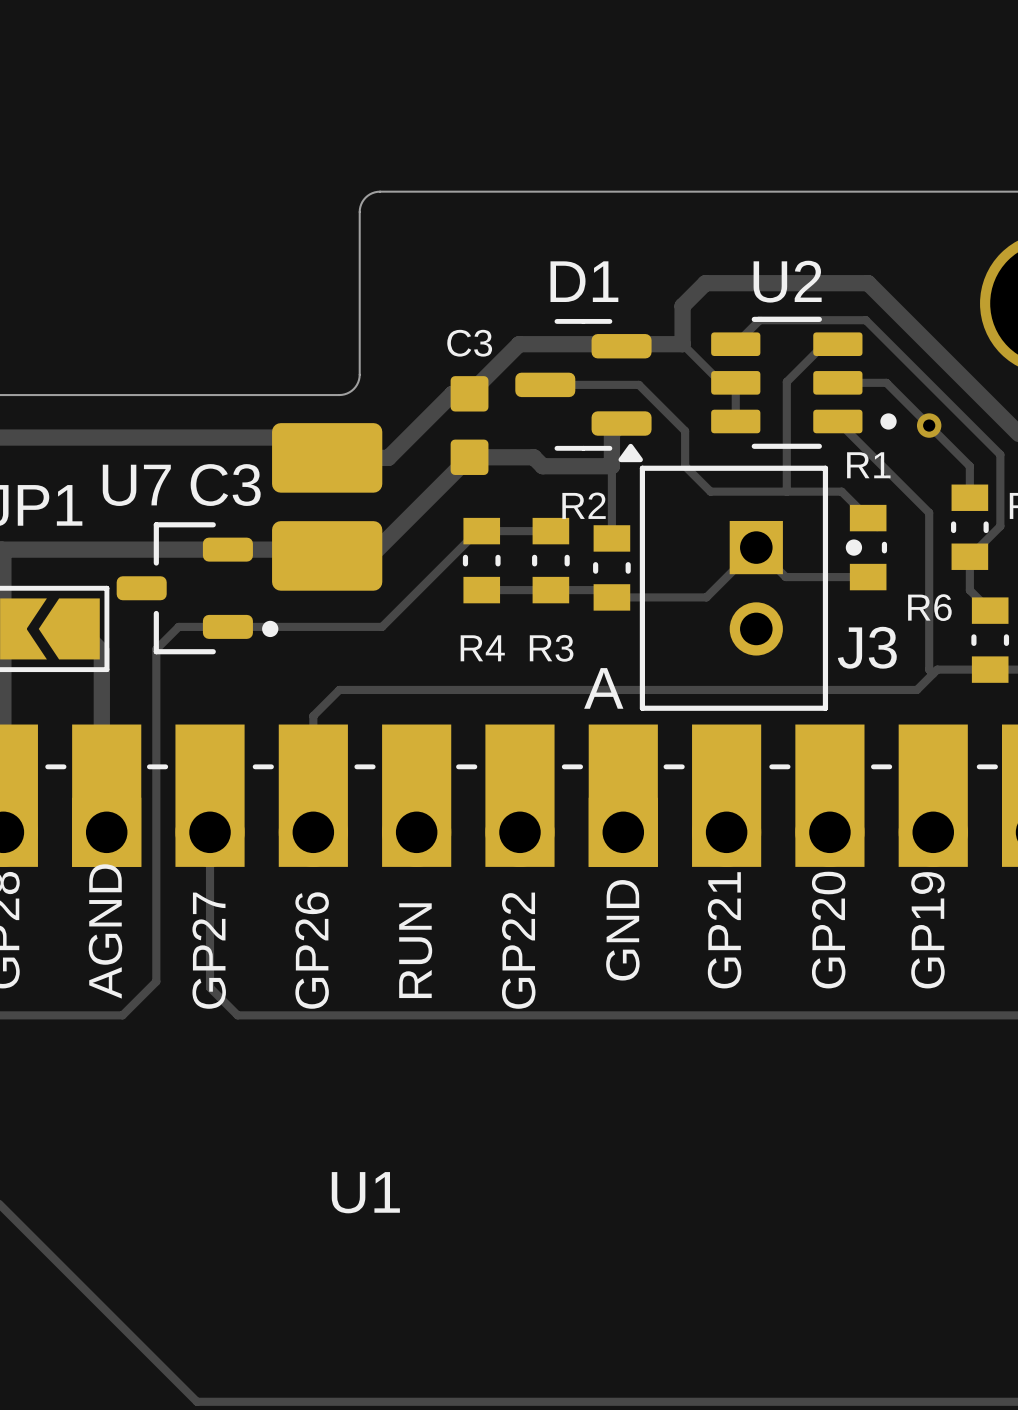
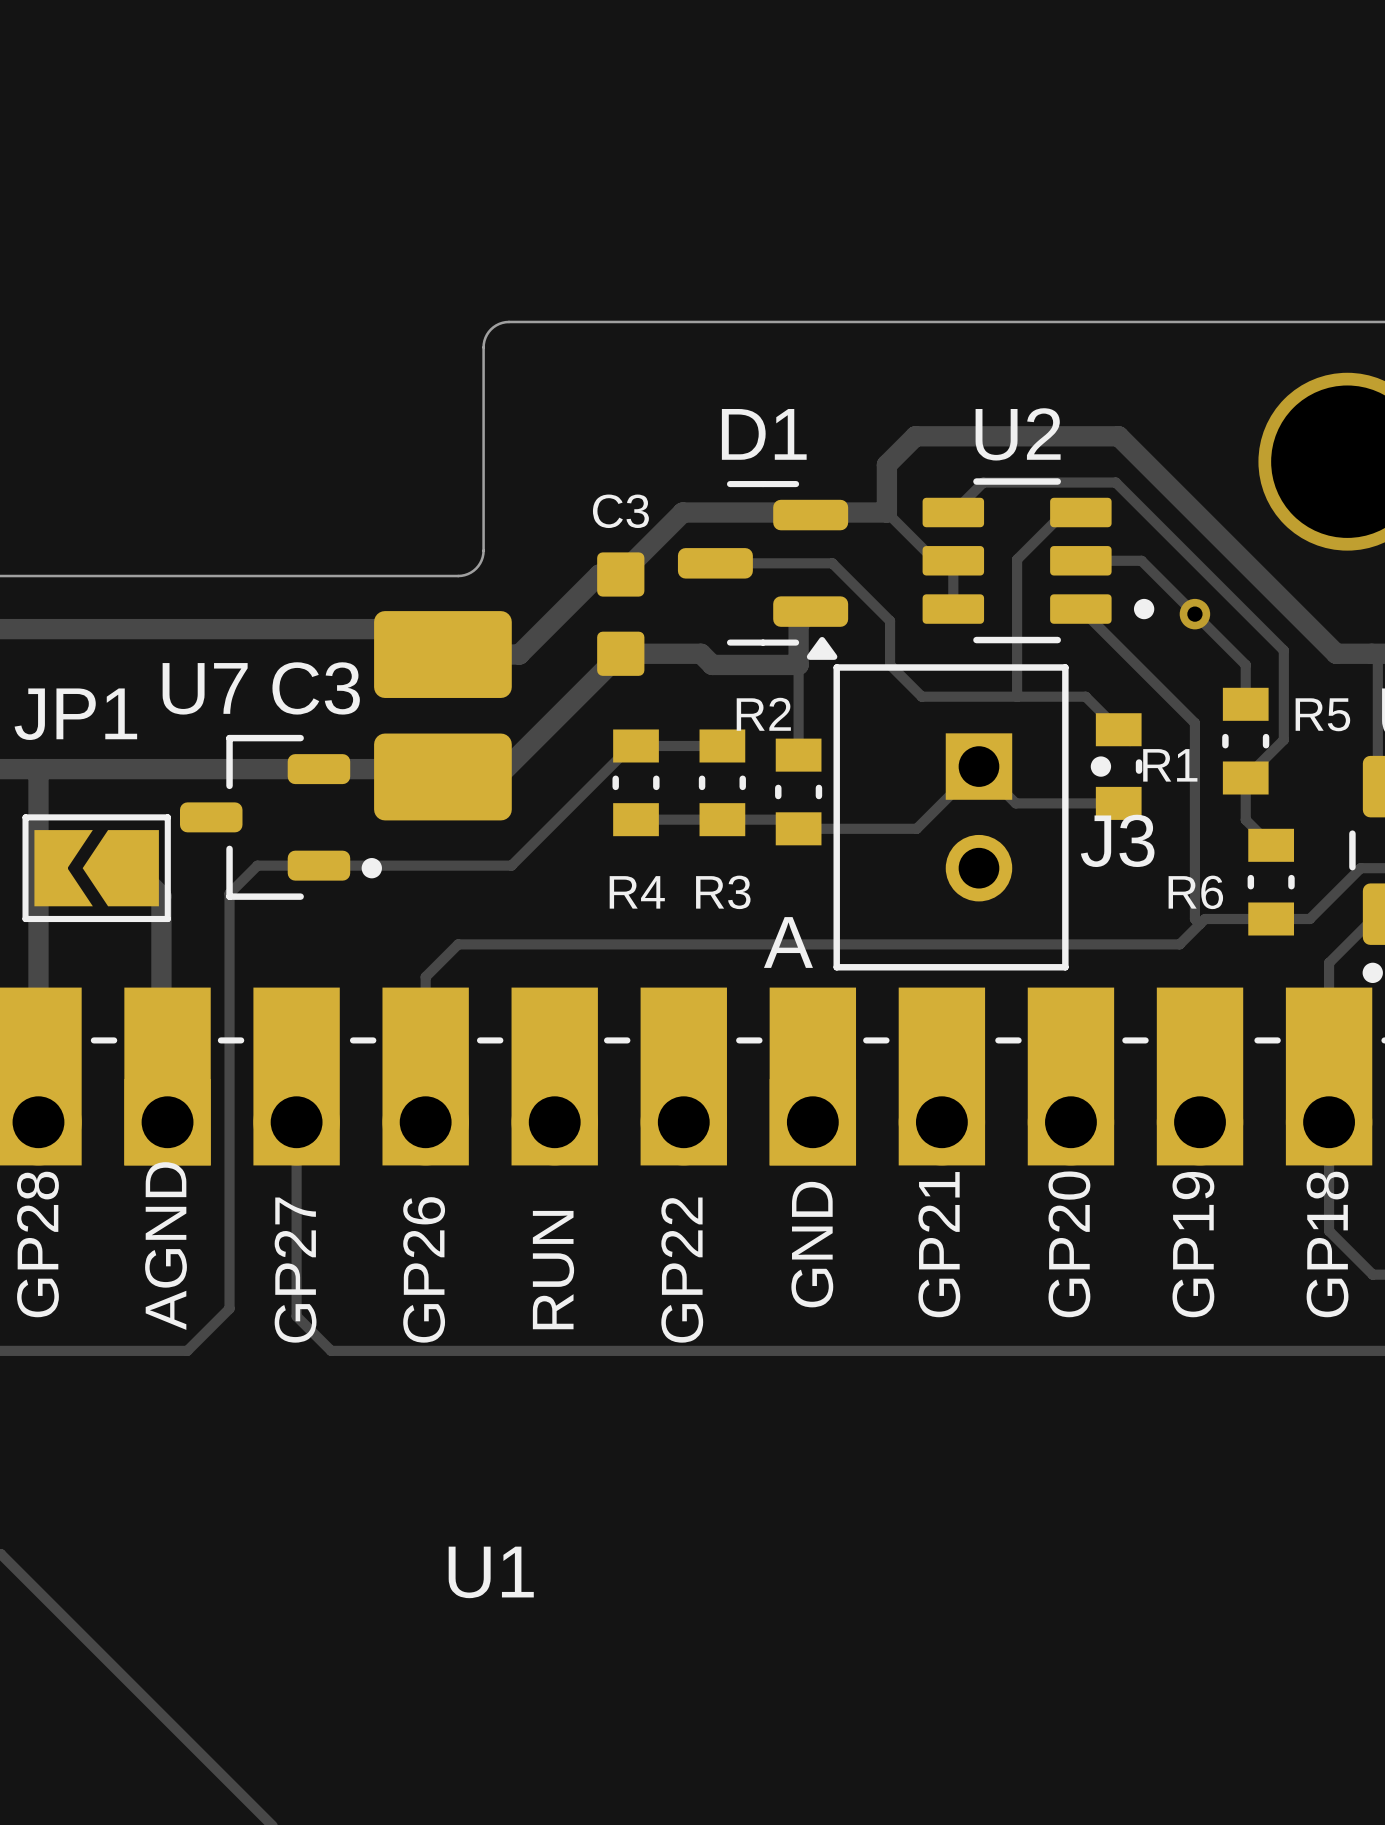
R1 name position: R1 (868, 465) -> R1 (1170, 765)
R6 name position: R6 (929, 607) -> R6 (1195, 892)
J3 name position: J3 (867, 647) -> J3 (1117, 840)

